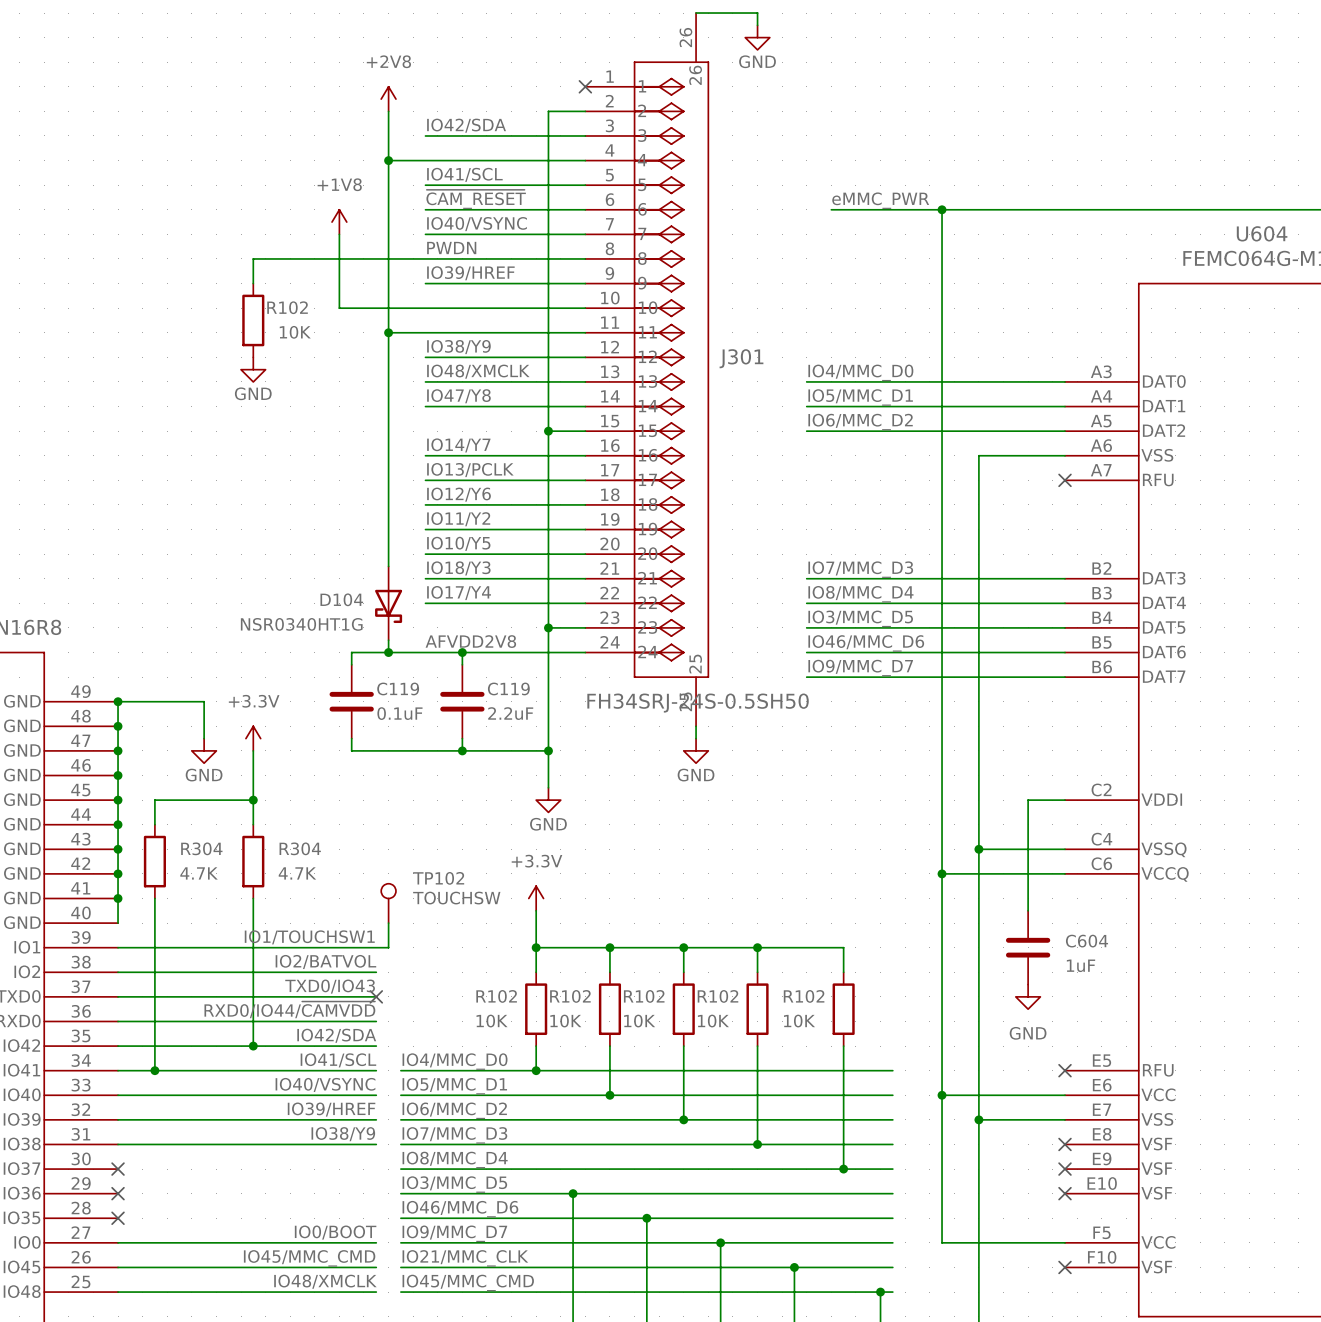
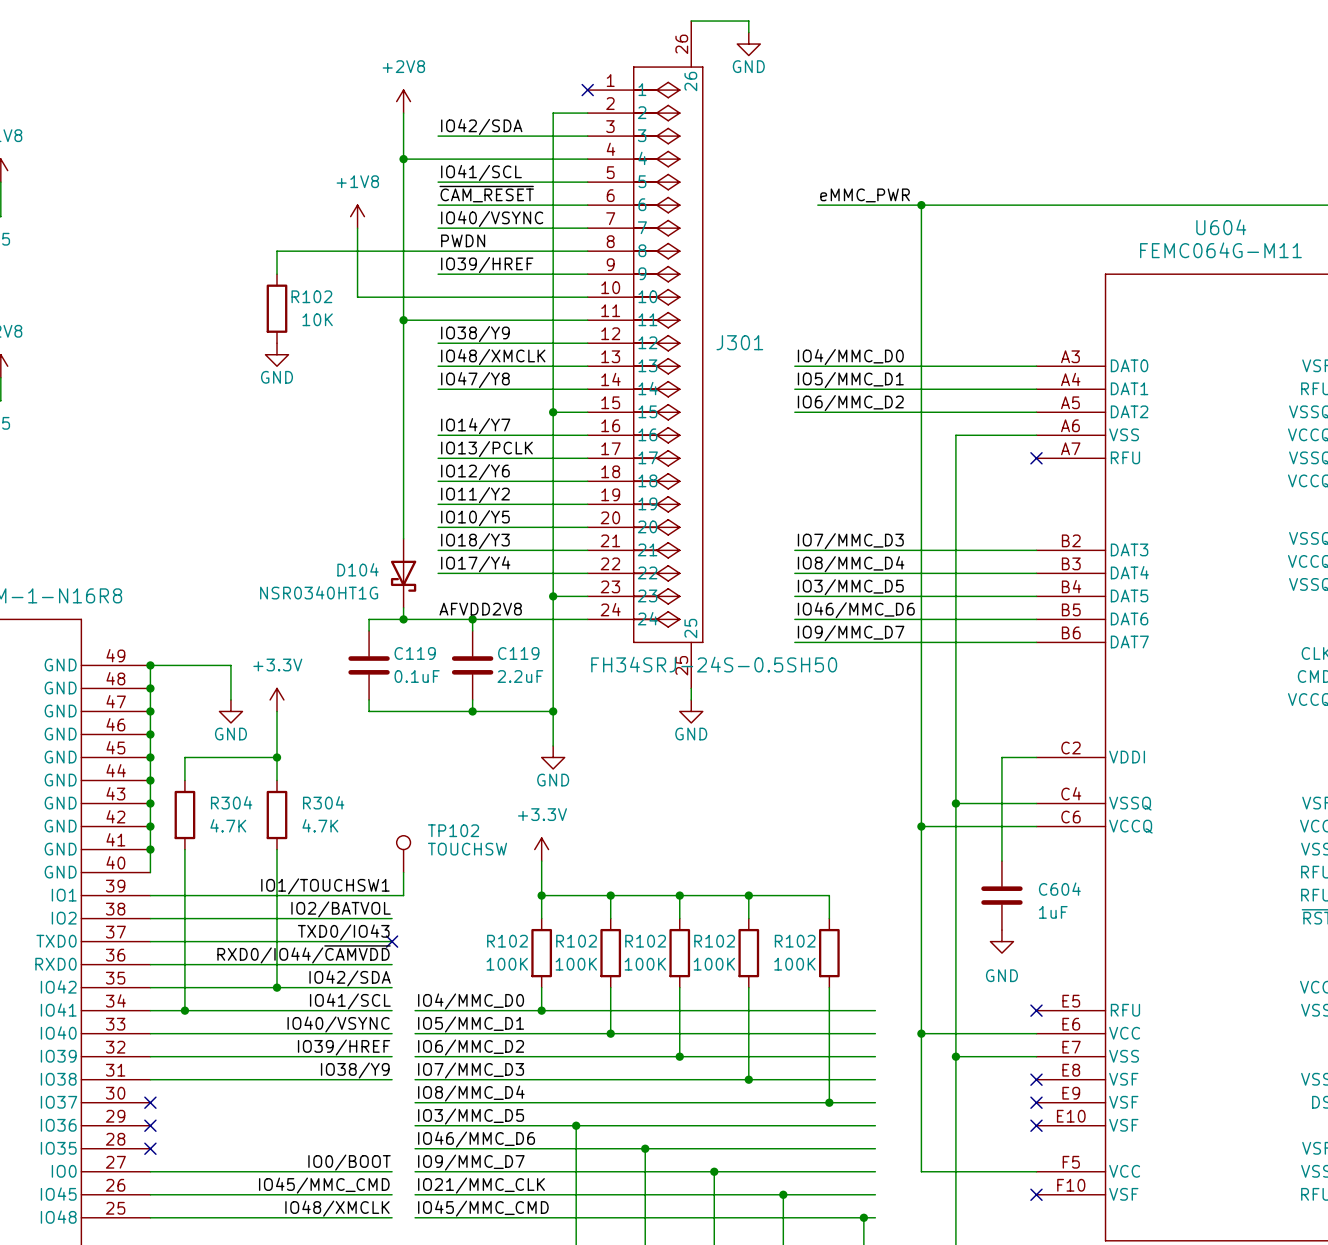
R102 value: 10K (492, 1021) -> 100K (507, 964)
R102 value: 10K (565, 1021) -> 100K (576, 964)
R102 value: 10K (639, 1021) -> 100K (645, 964)
R102 value: 10K (713, 1021) -> 100K (714, 964)
R102 value: 10K (799, 1021) -> 100K (794, 964)

